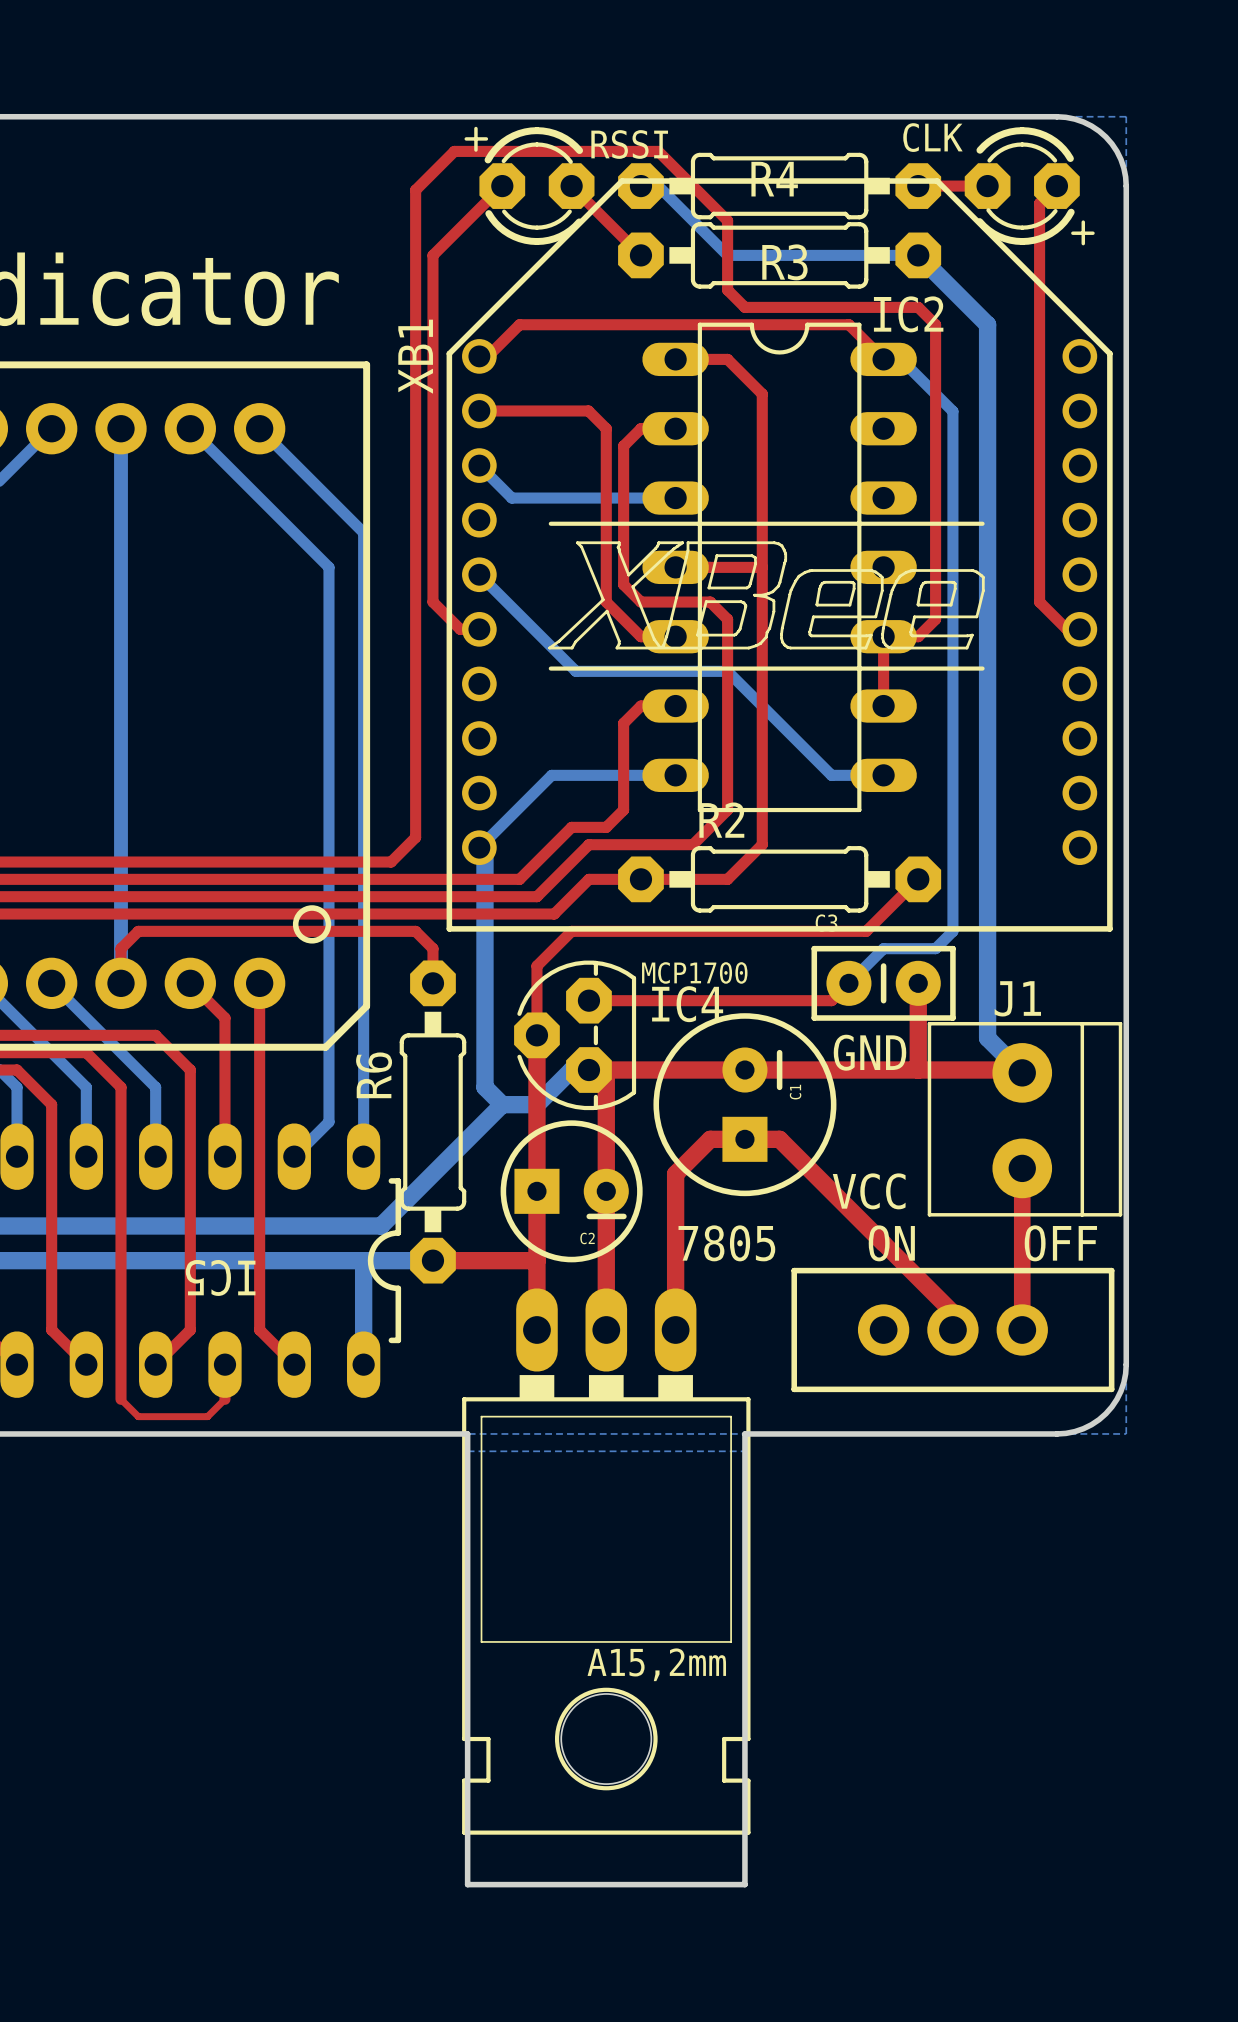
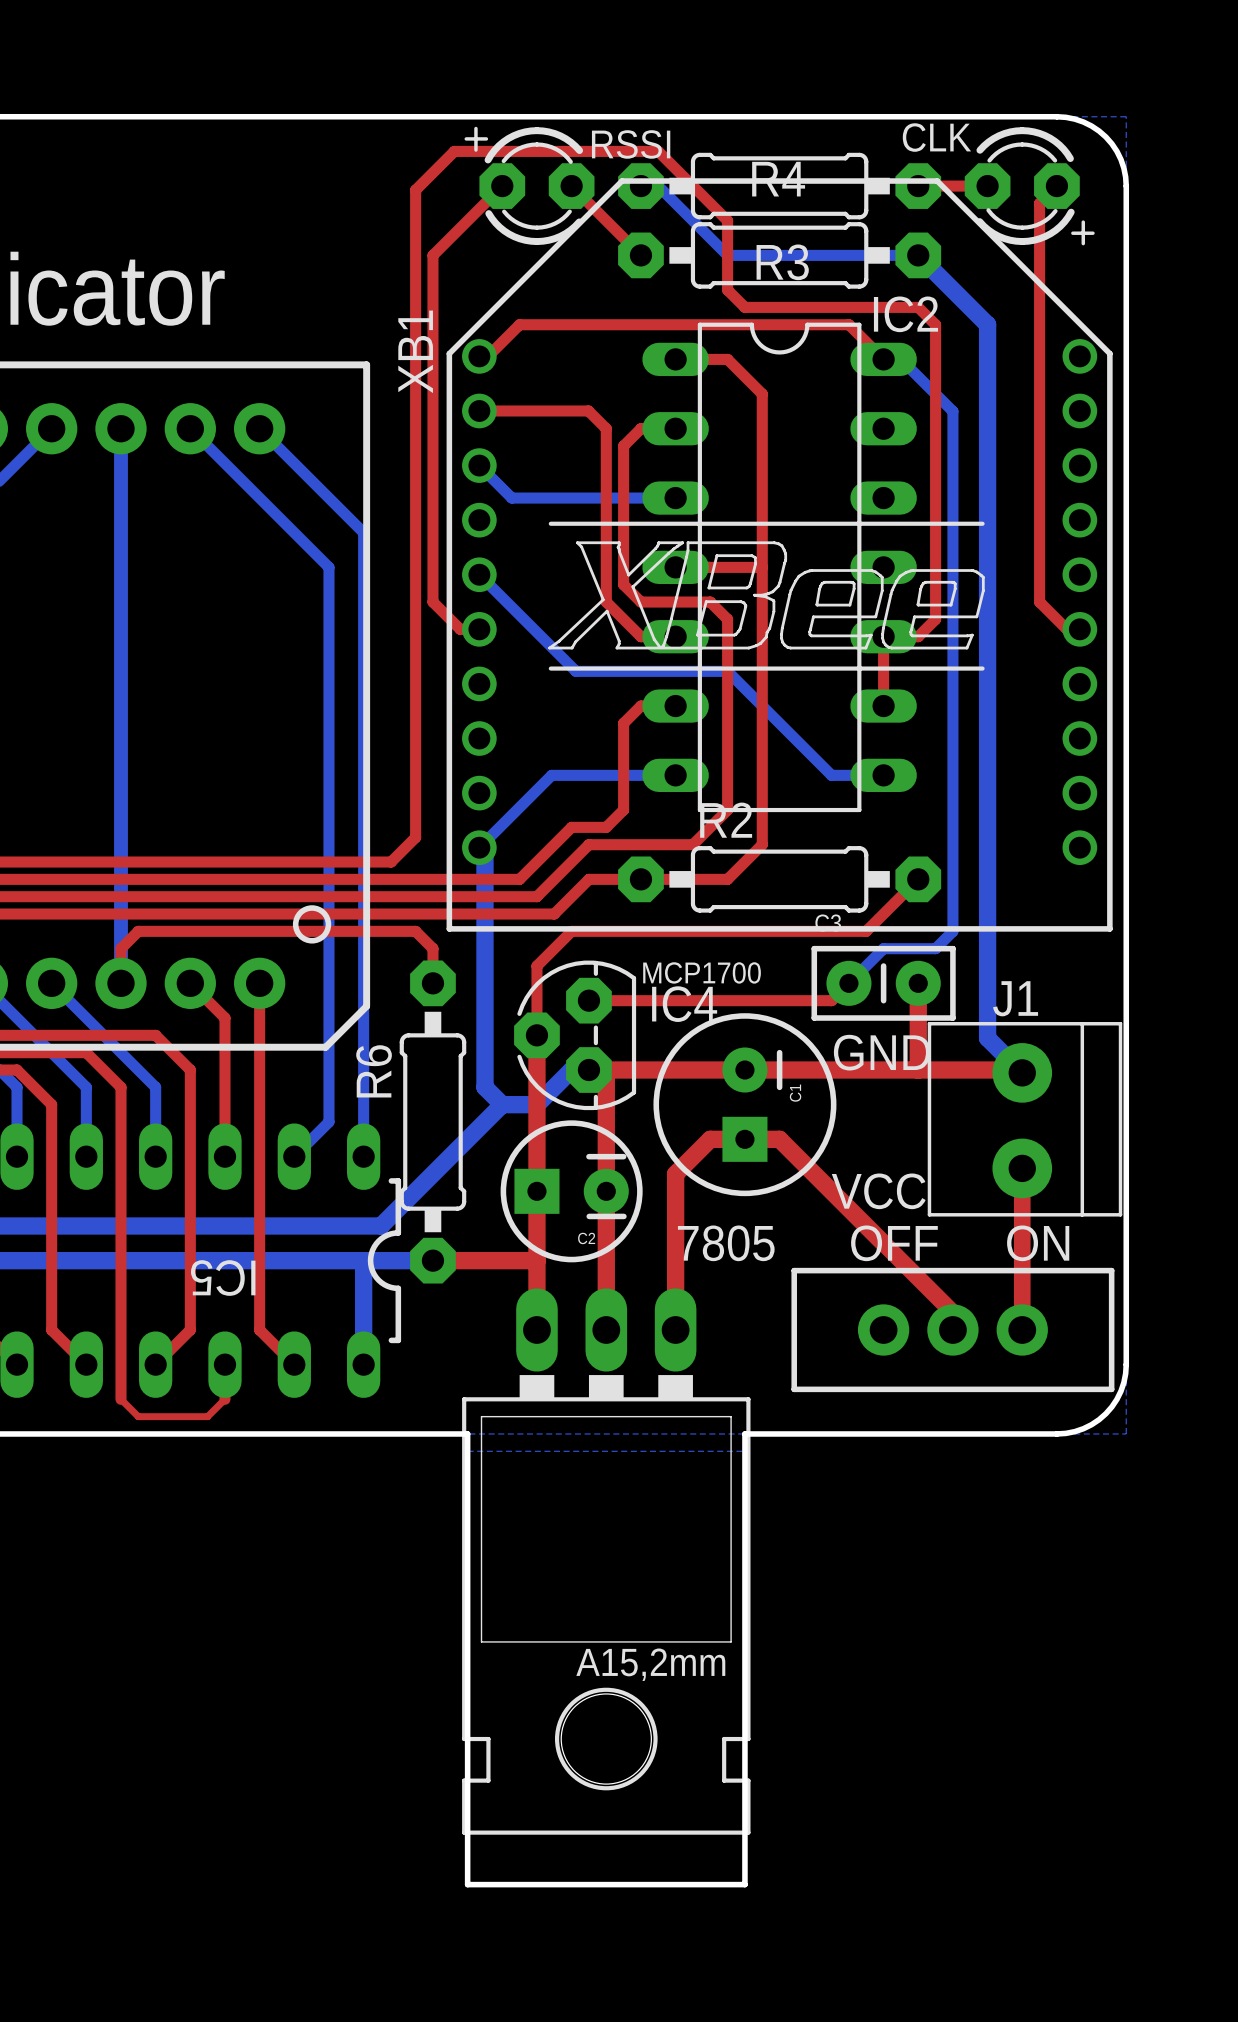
line: none -> (588, 1156) (623, 1156)
text: ON (891, 1243) -> OFF (894, 1243)
text: OFF (1060, 1243) -> ON (1038, 1243)

